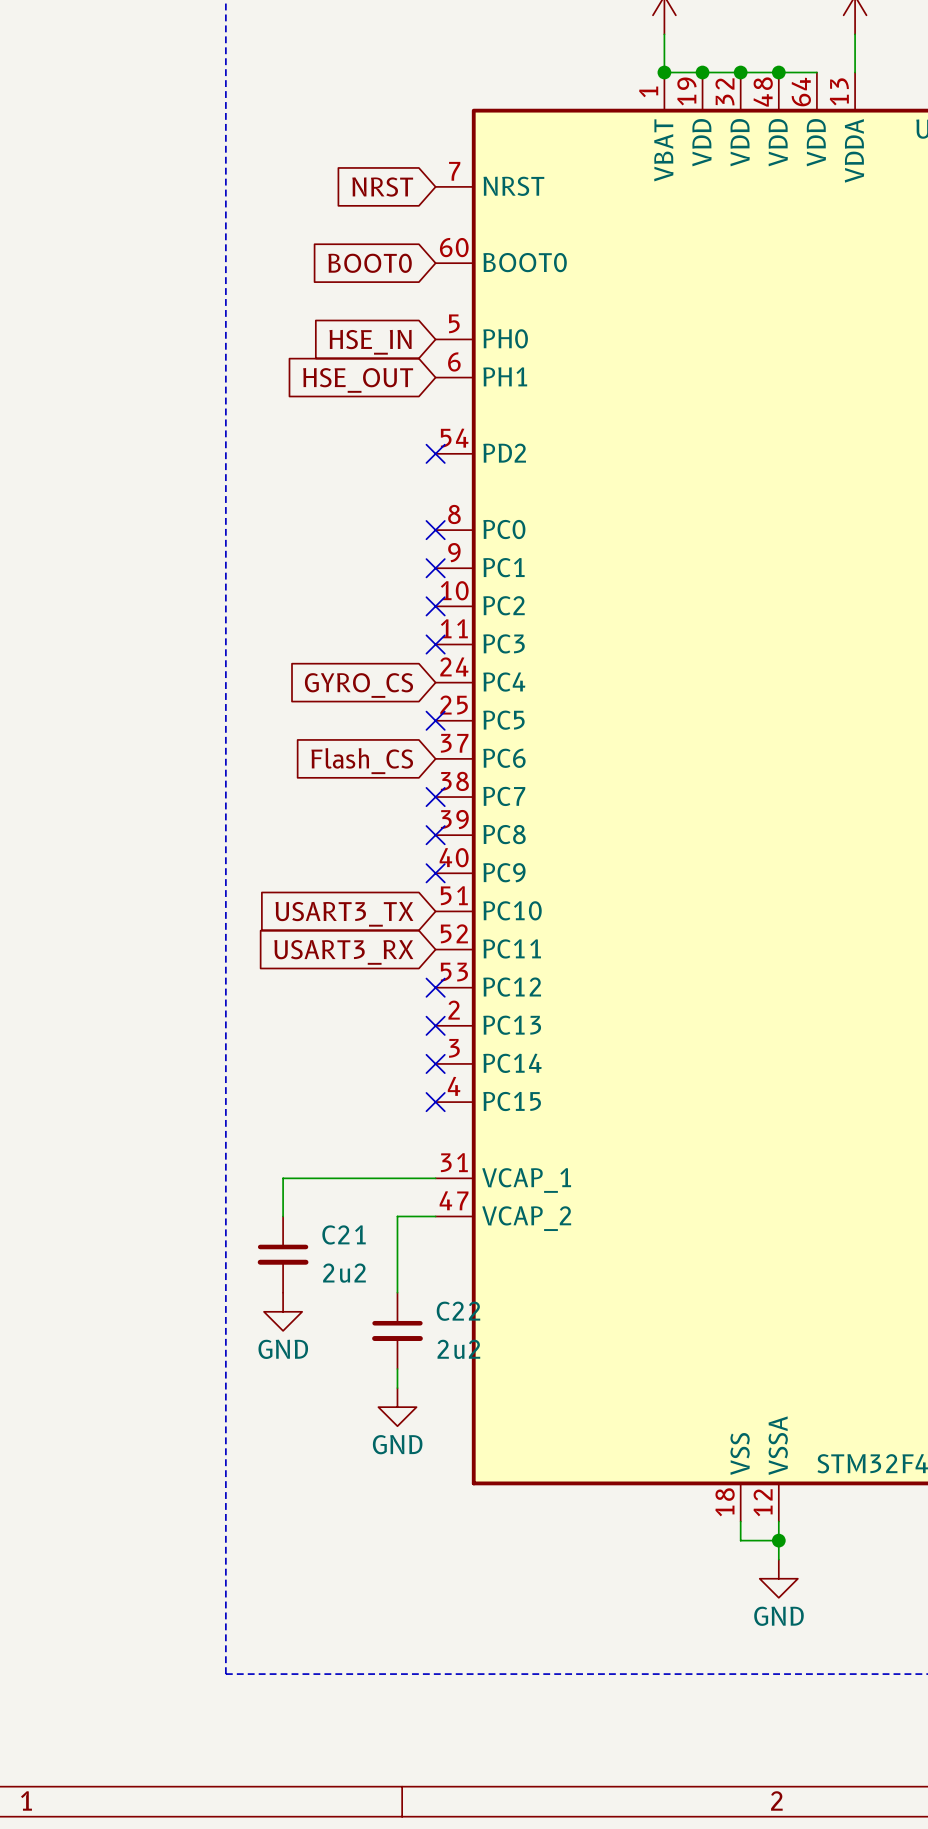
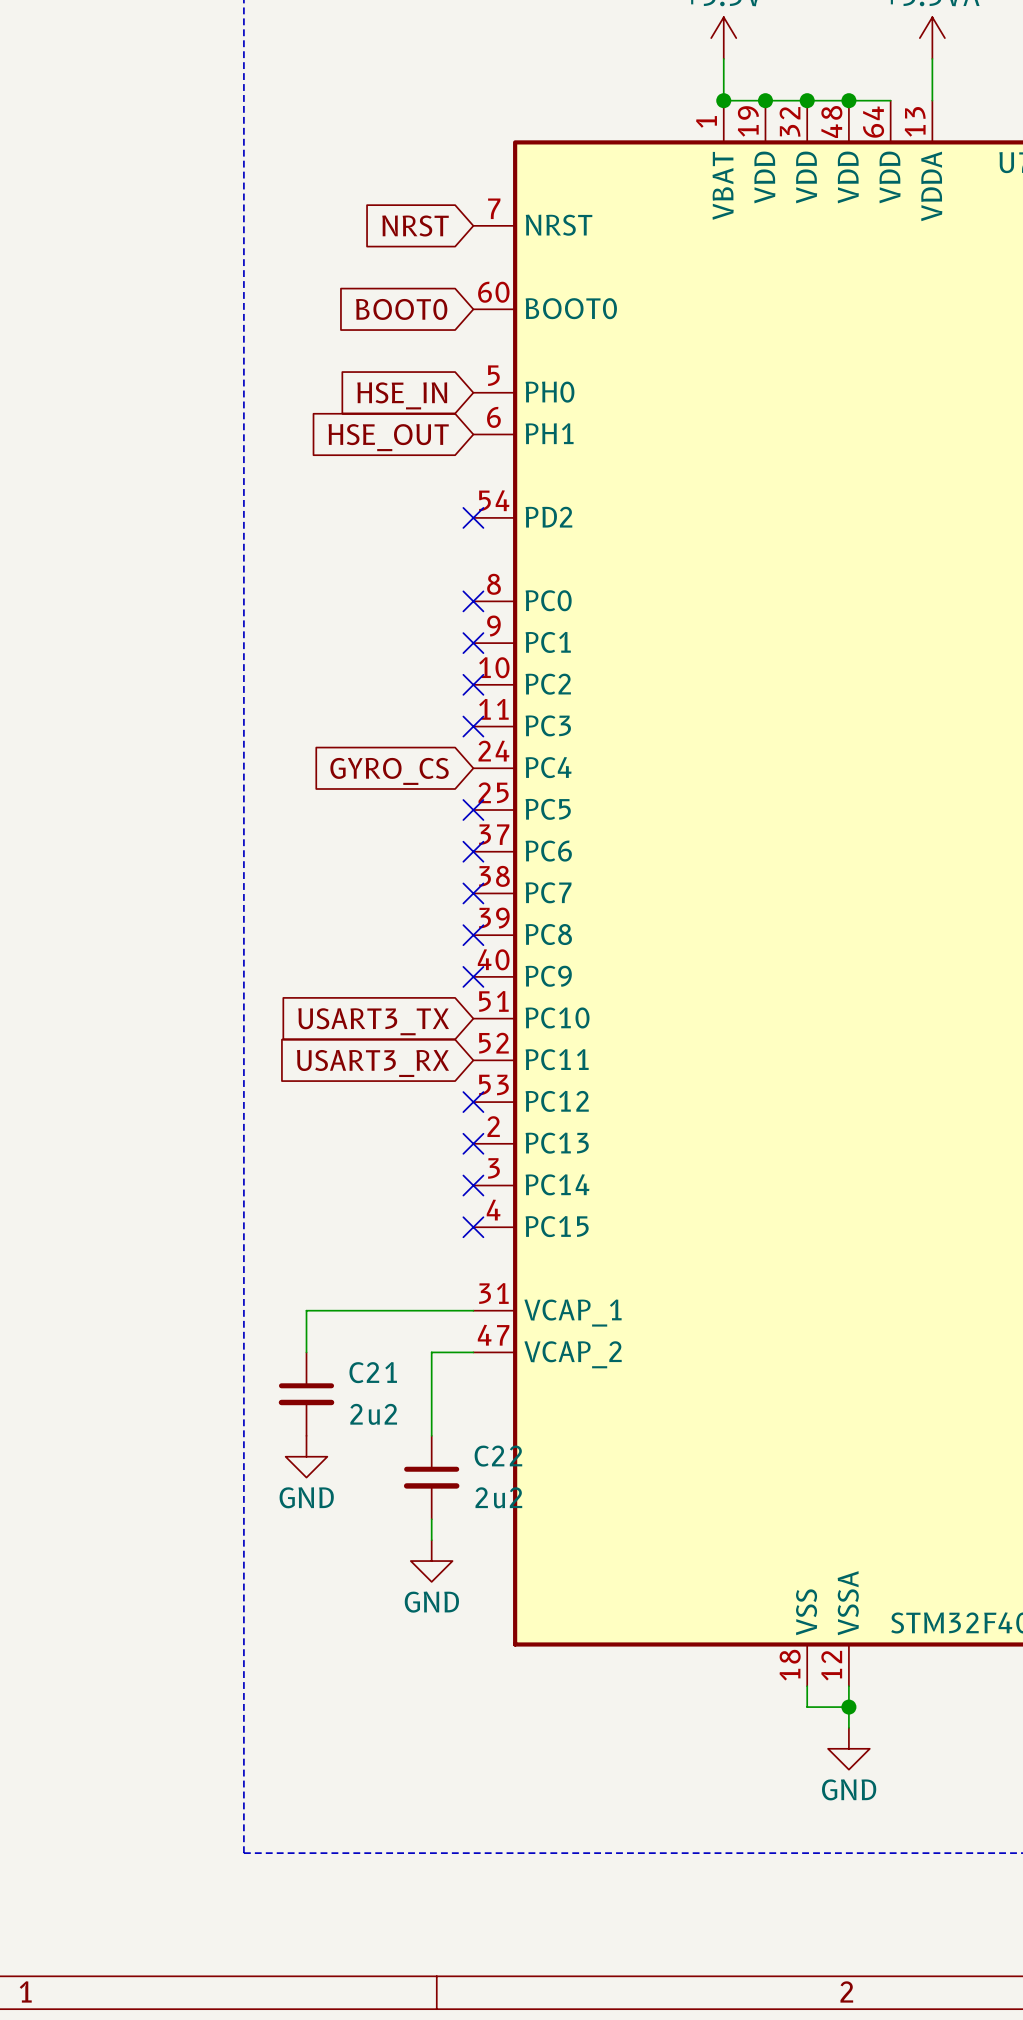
no-connect mark: none -> (473, 851)
global label: Flash_CS (362, 761) -> none

